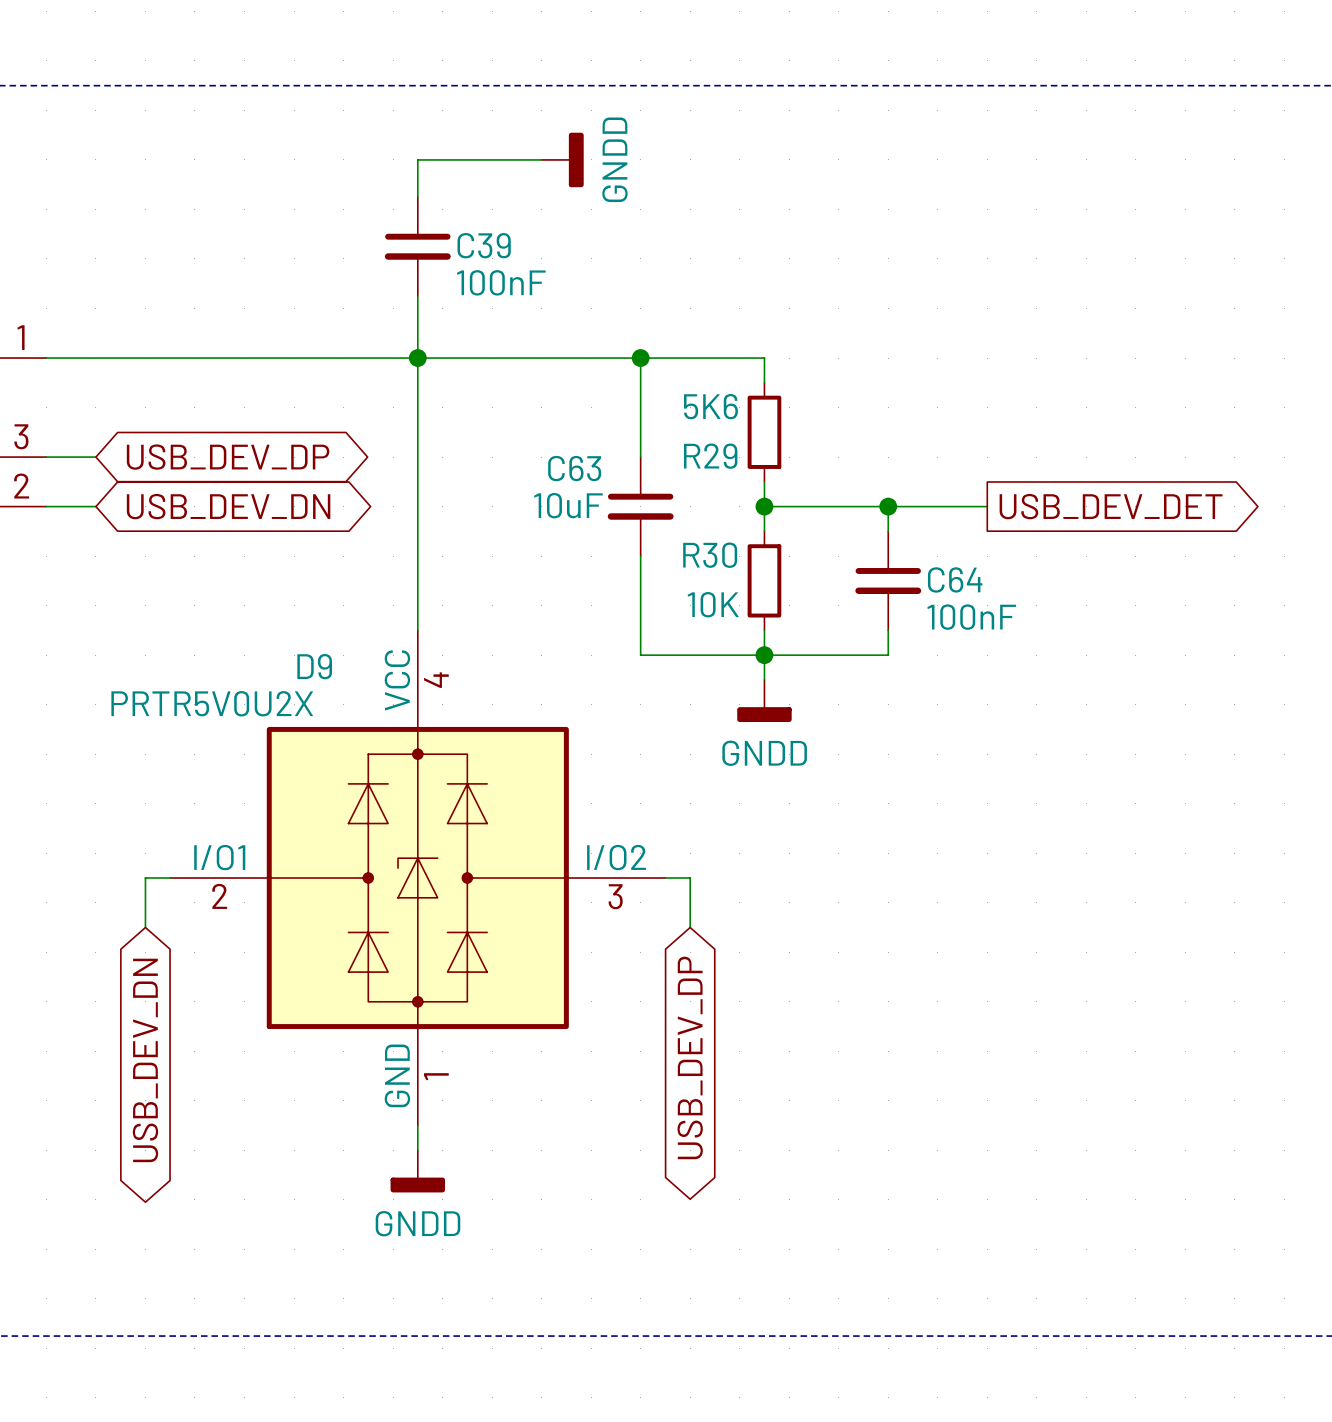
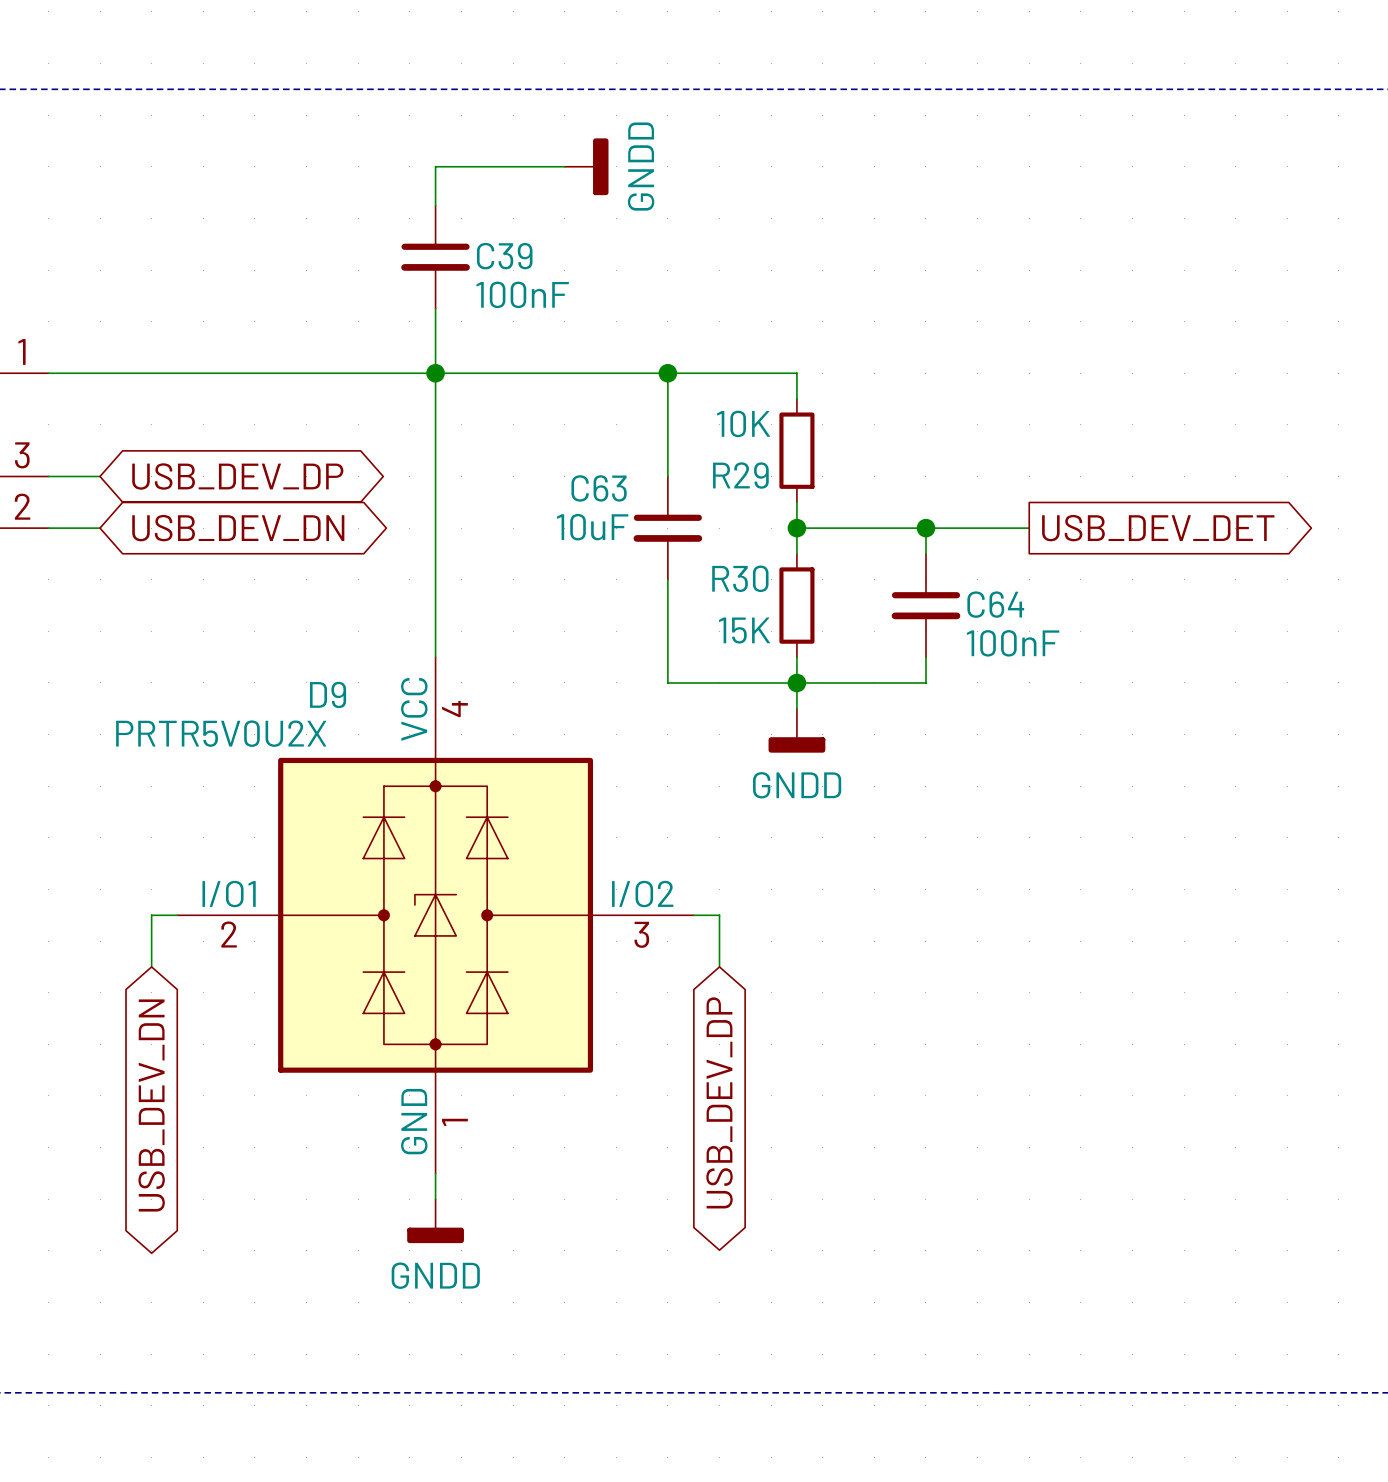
R29 value: 5K6 (710, 406) -> 10K (743, 423)
R30 value: 10K (713, 604) -> 15K (744, 630)

